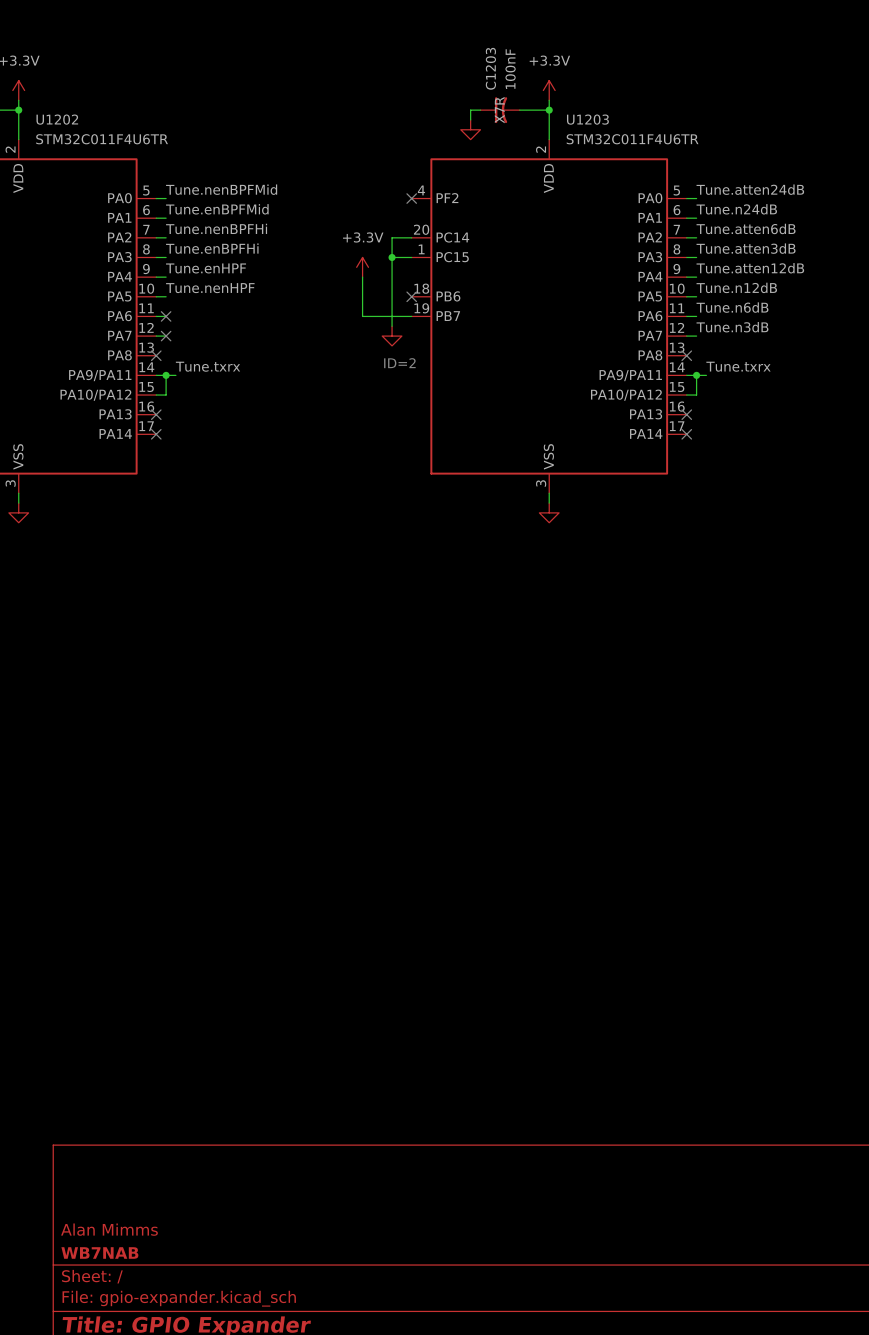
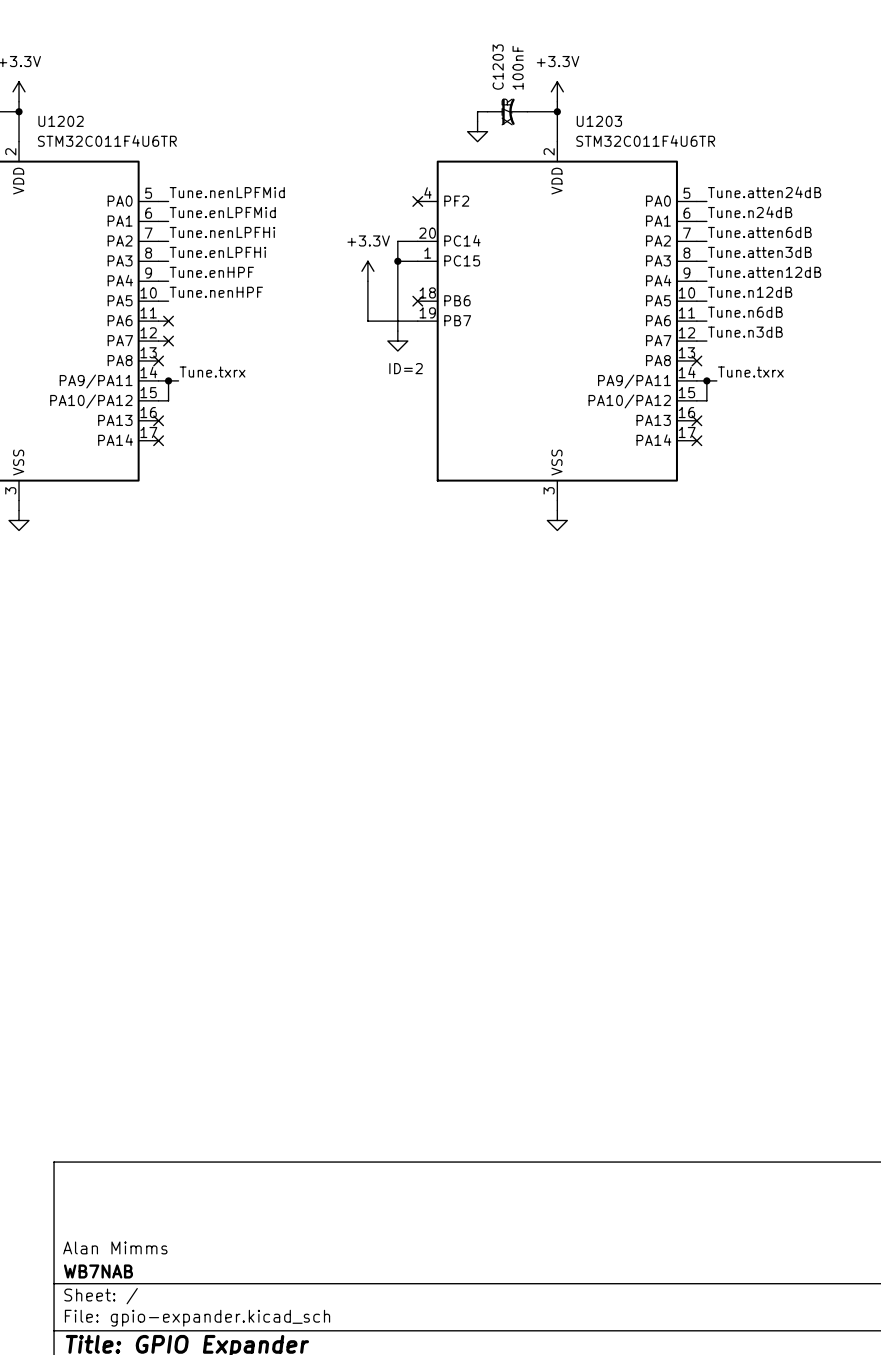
label: Tune.nenBPFMid (221, 189) -> Tune.nenLPFMid (227, 192)
label: Tune.enBPFMid (217, 209) -> Tune.enLPFMid (222, 212)
label: Tune.nenBPFHi (216, 228) -> Tune.nenLPFHi (222, 232)
label: Tune.enBPFHi (212, 248) -> Tune.enLPFHi (217, 252)

